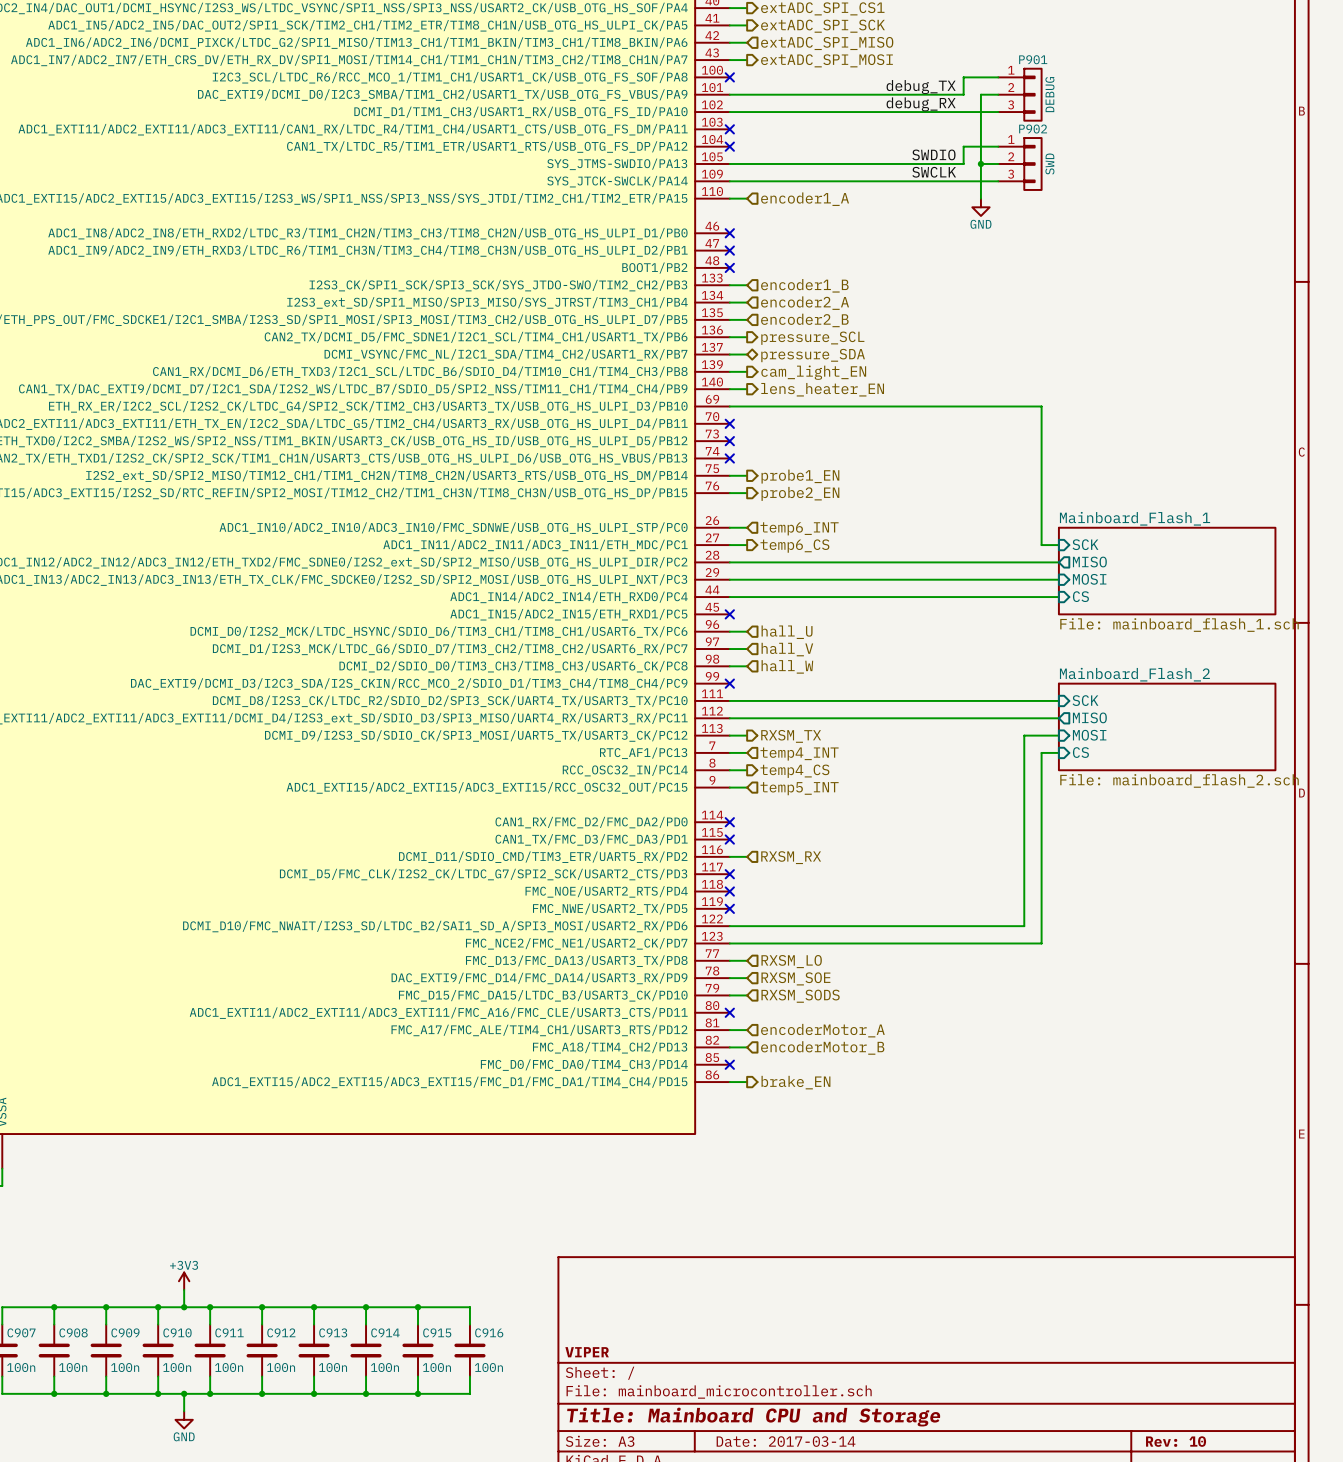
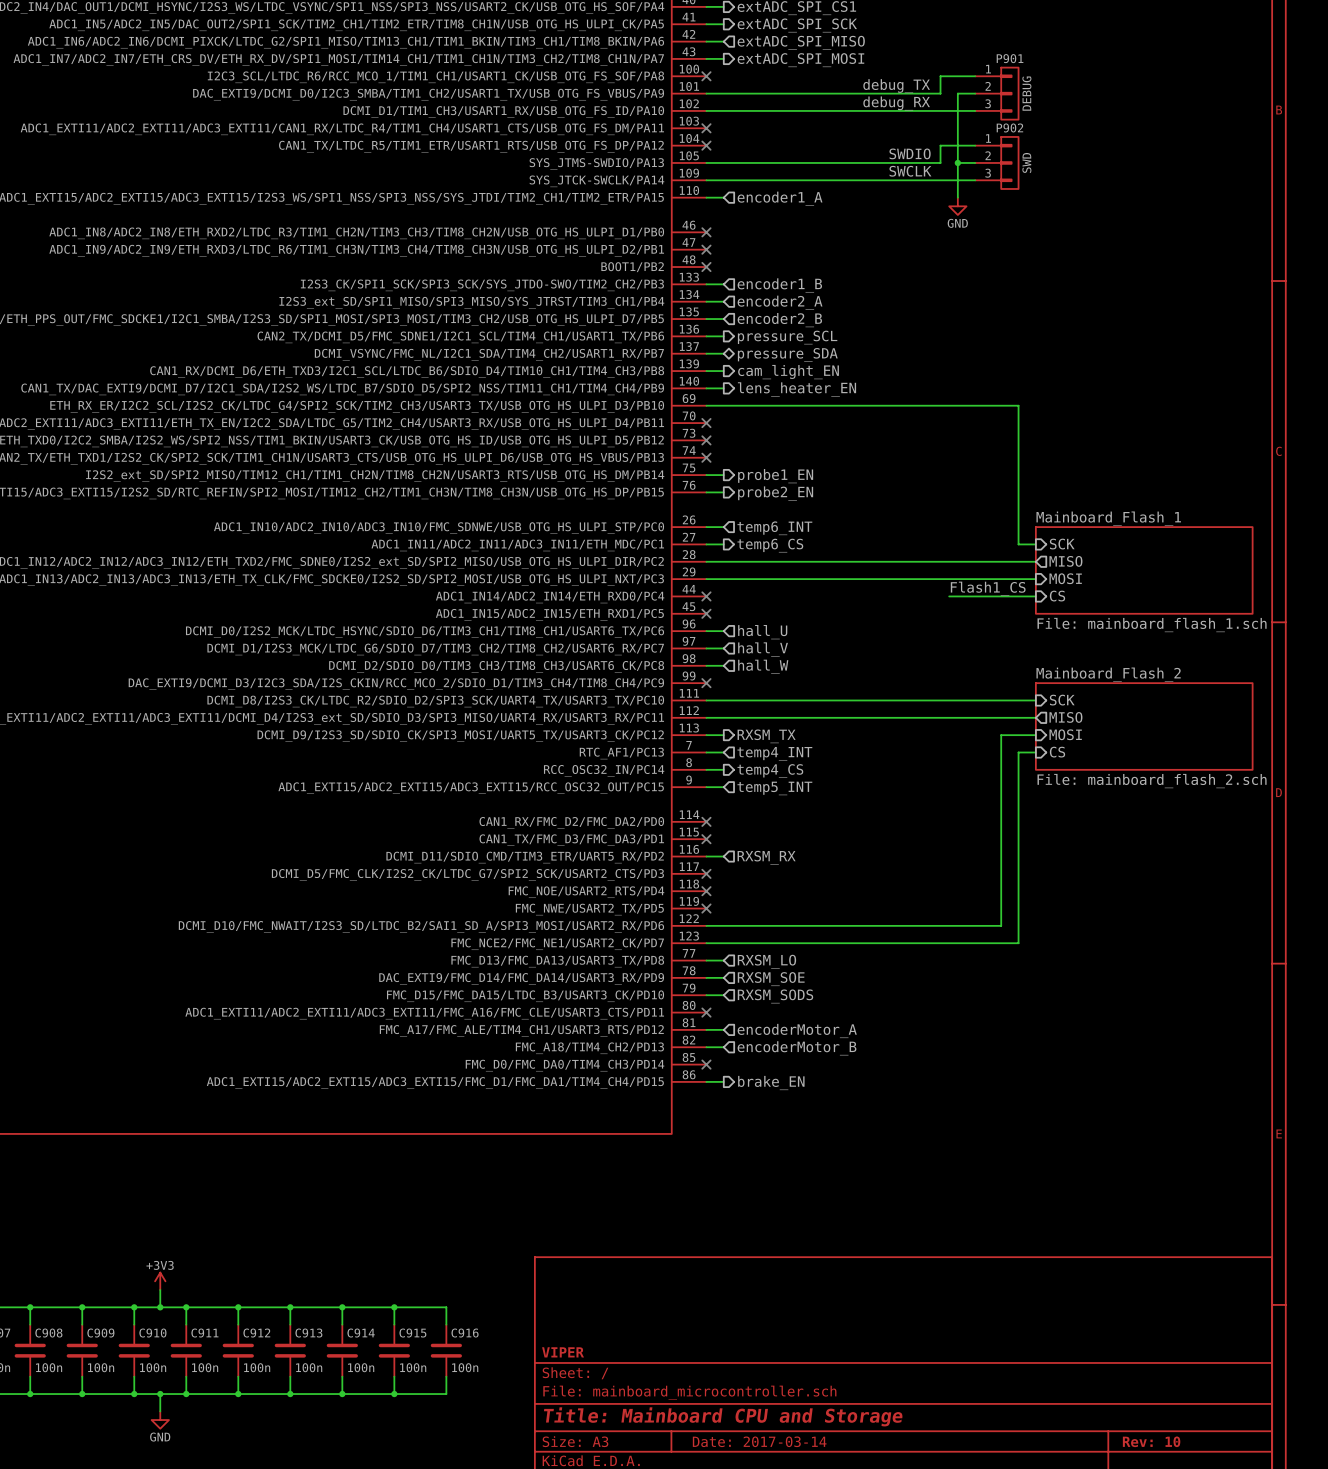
label: none -> Flash1_CS (988, 588)
wire: (729, 597) (972, 597) -> none
no-connect mark: none -> (706, 596)

